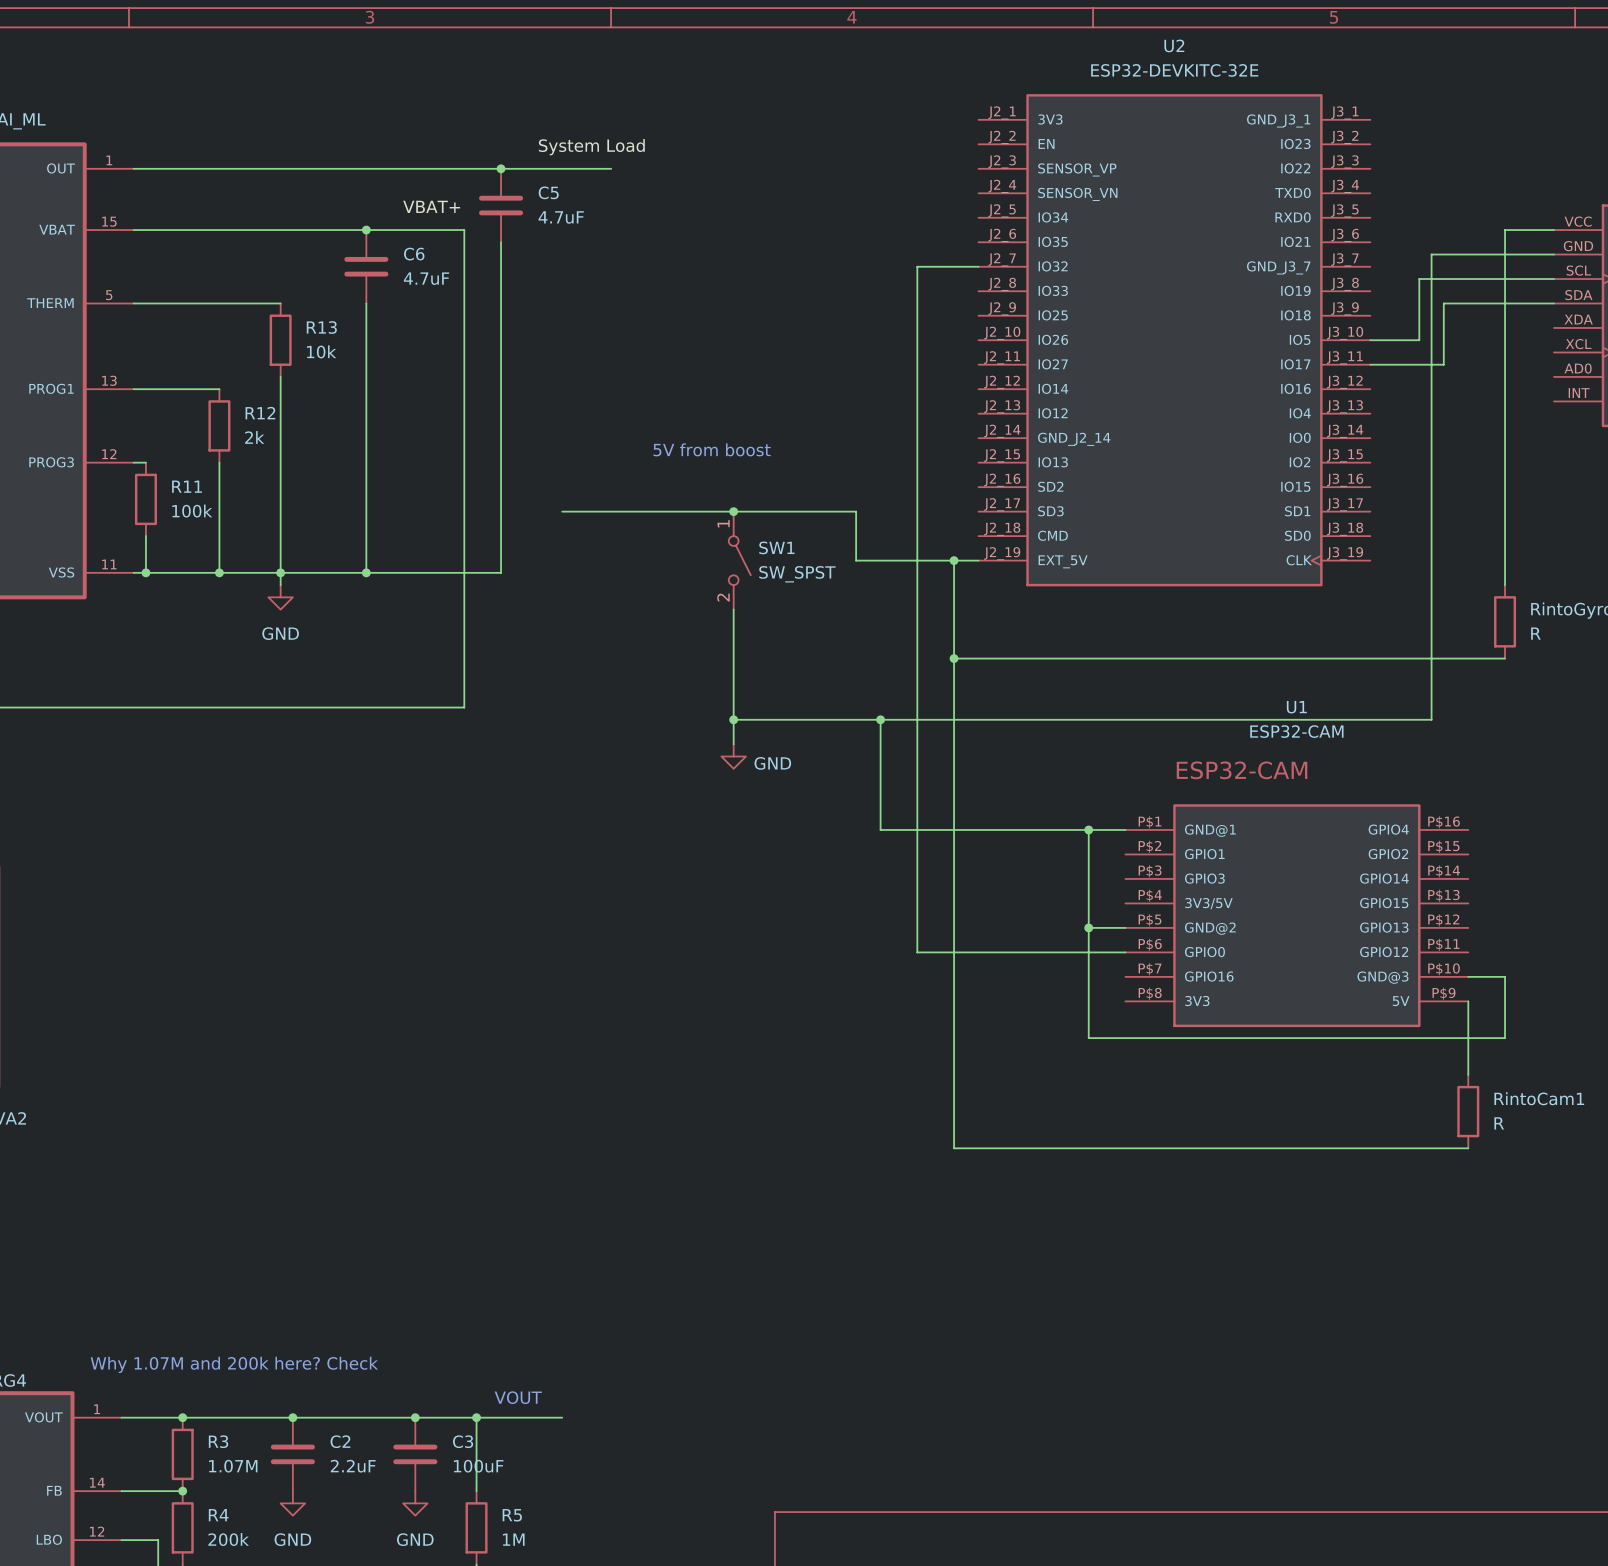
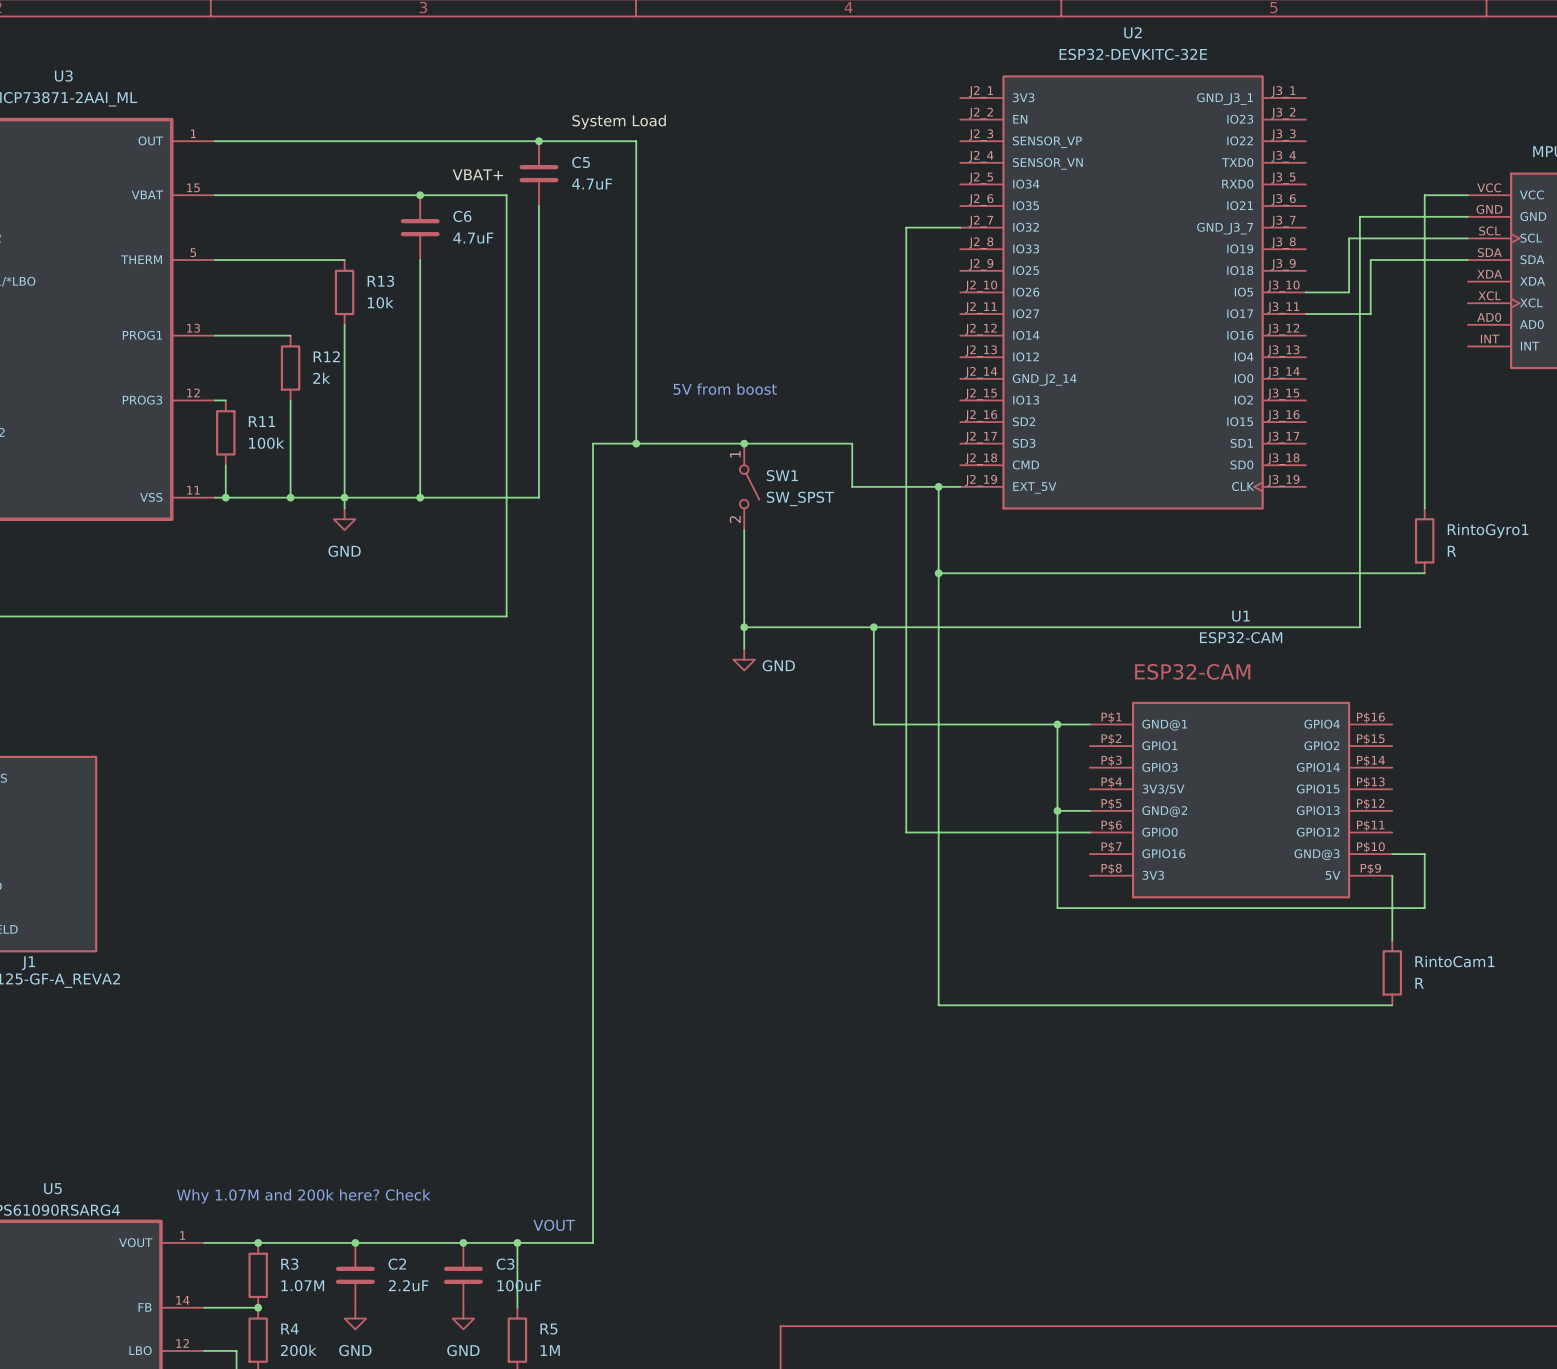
wire: none -> (636, 141) (636, 443)
wire: none -> (593, 443) (593, 1242)
junction: none -> (636, 443)

